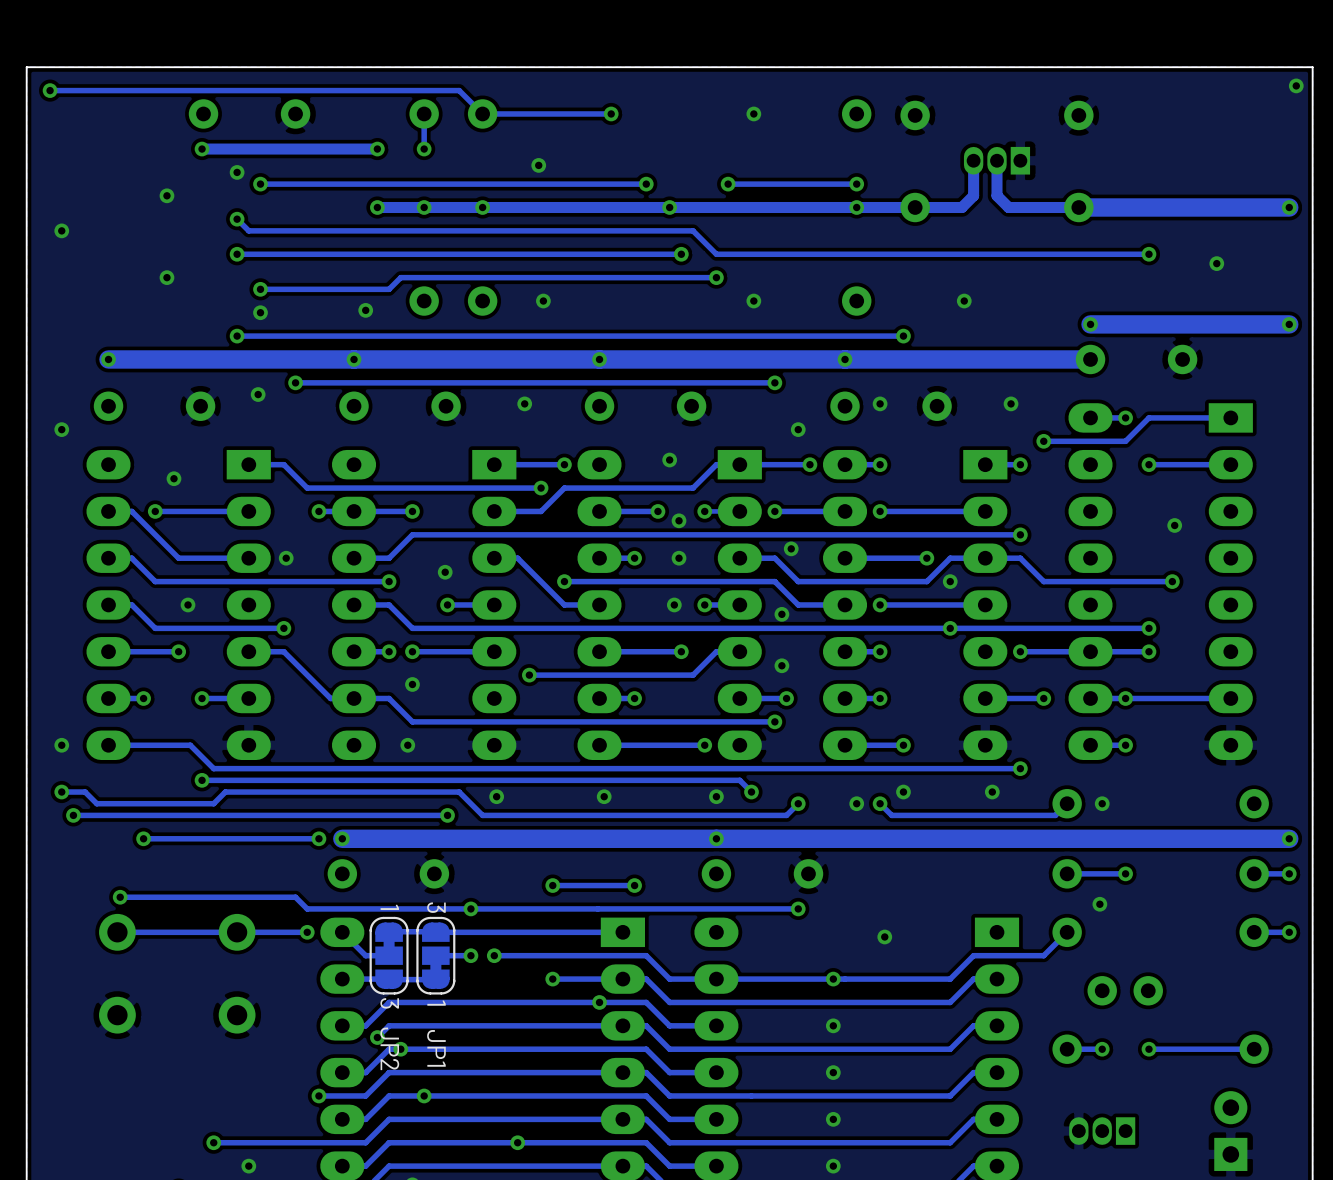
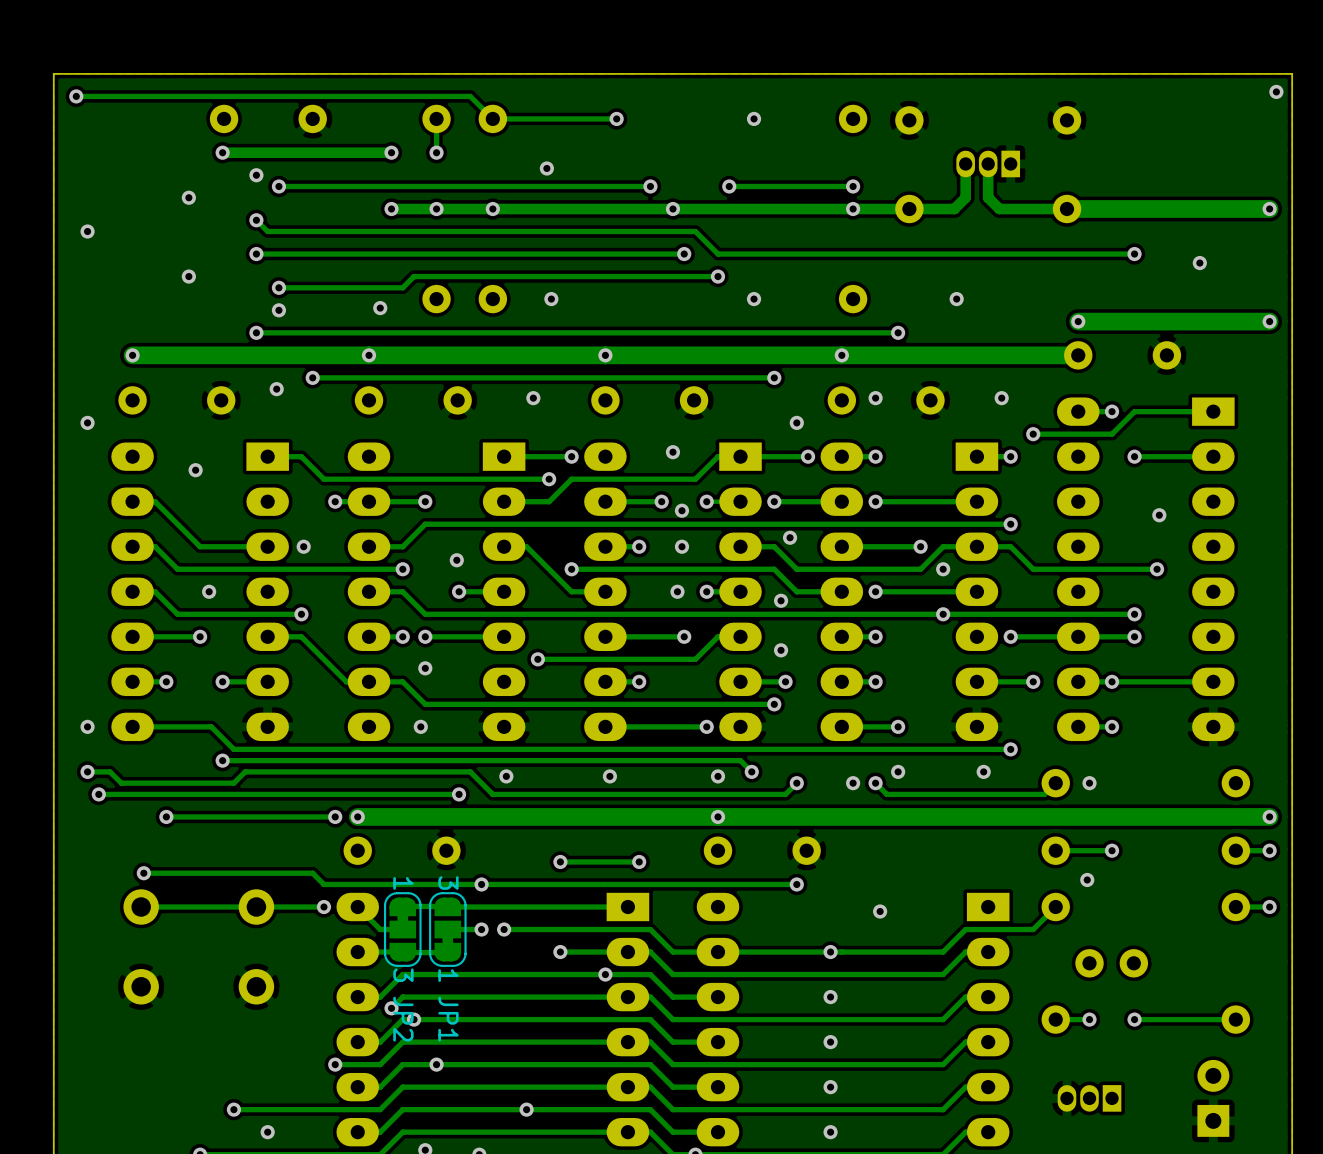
via: (155, 511) -> none
track: (248, 511) (155, 511) -> none

